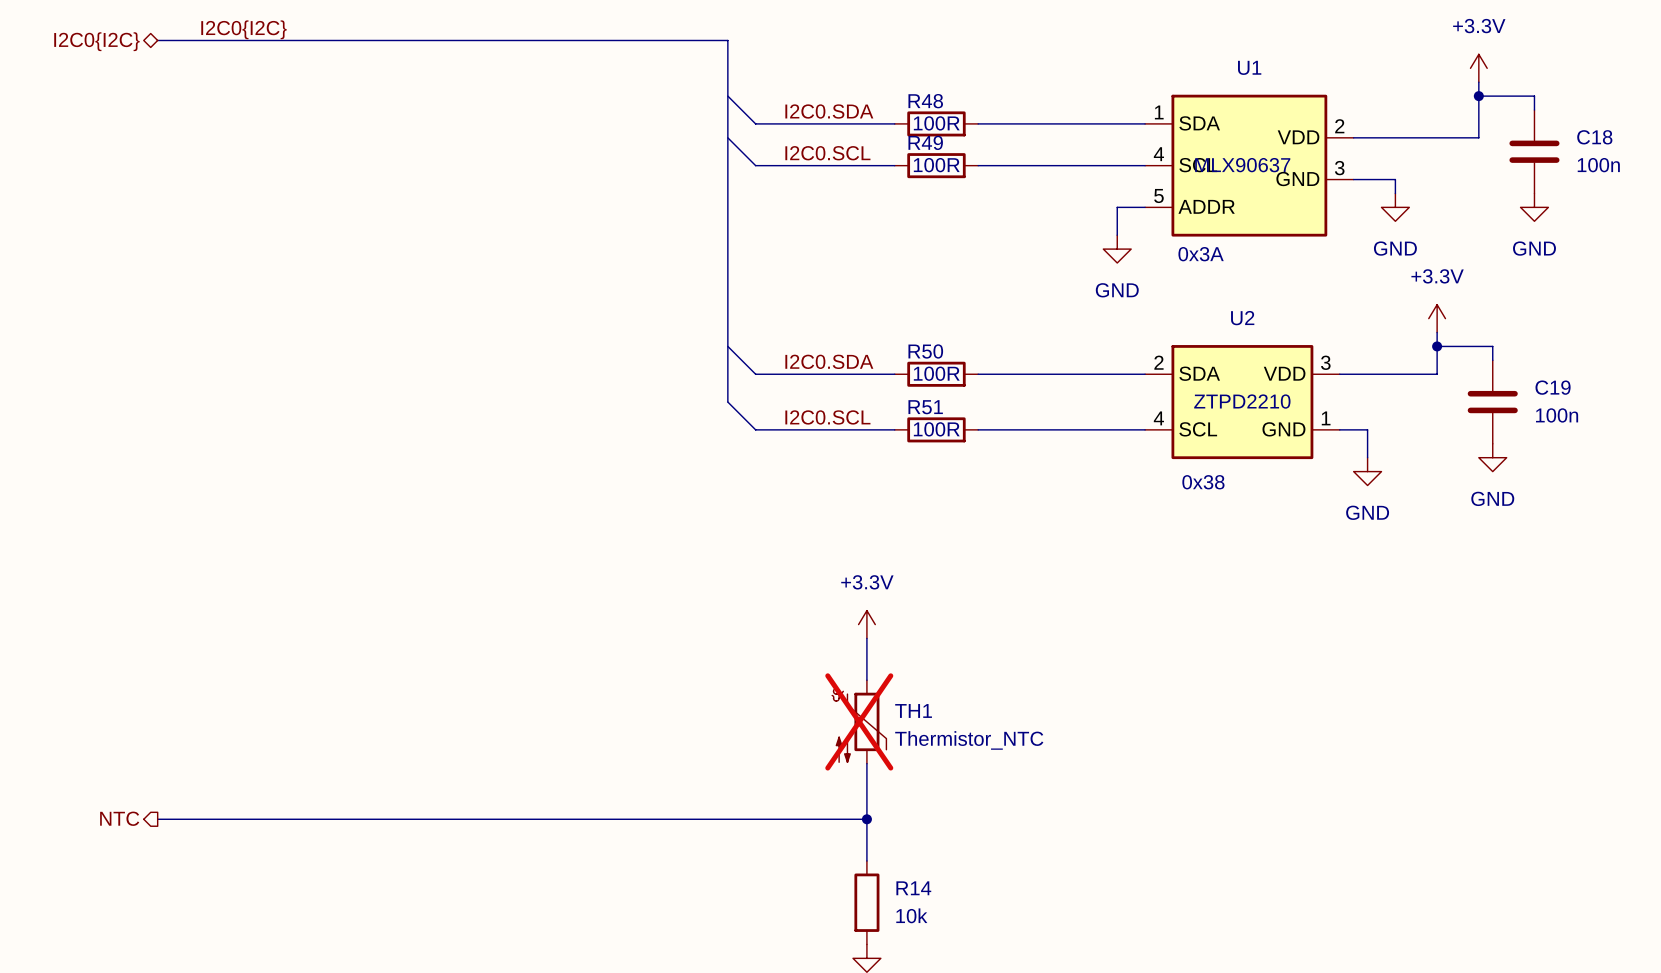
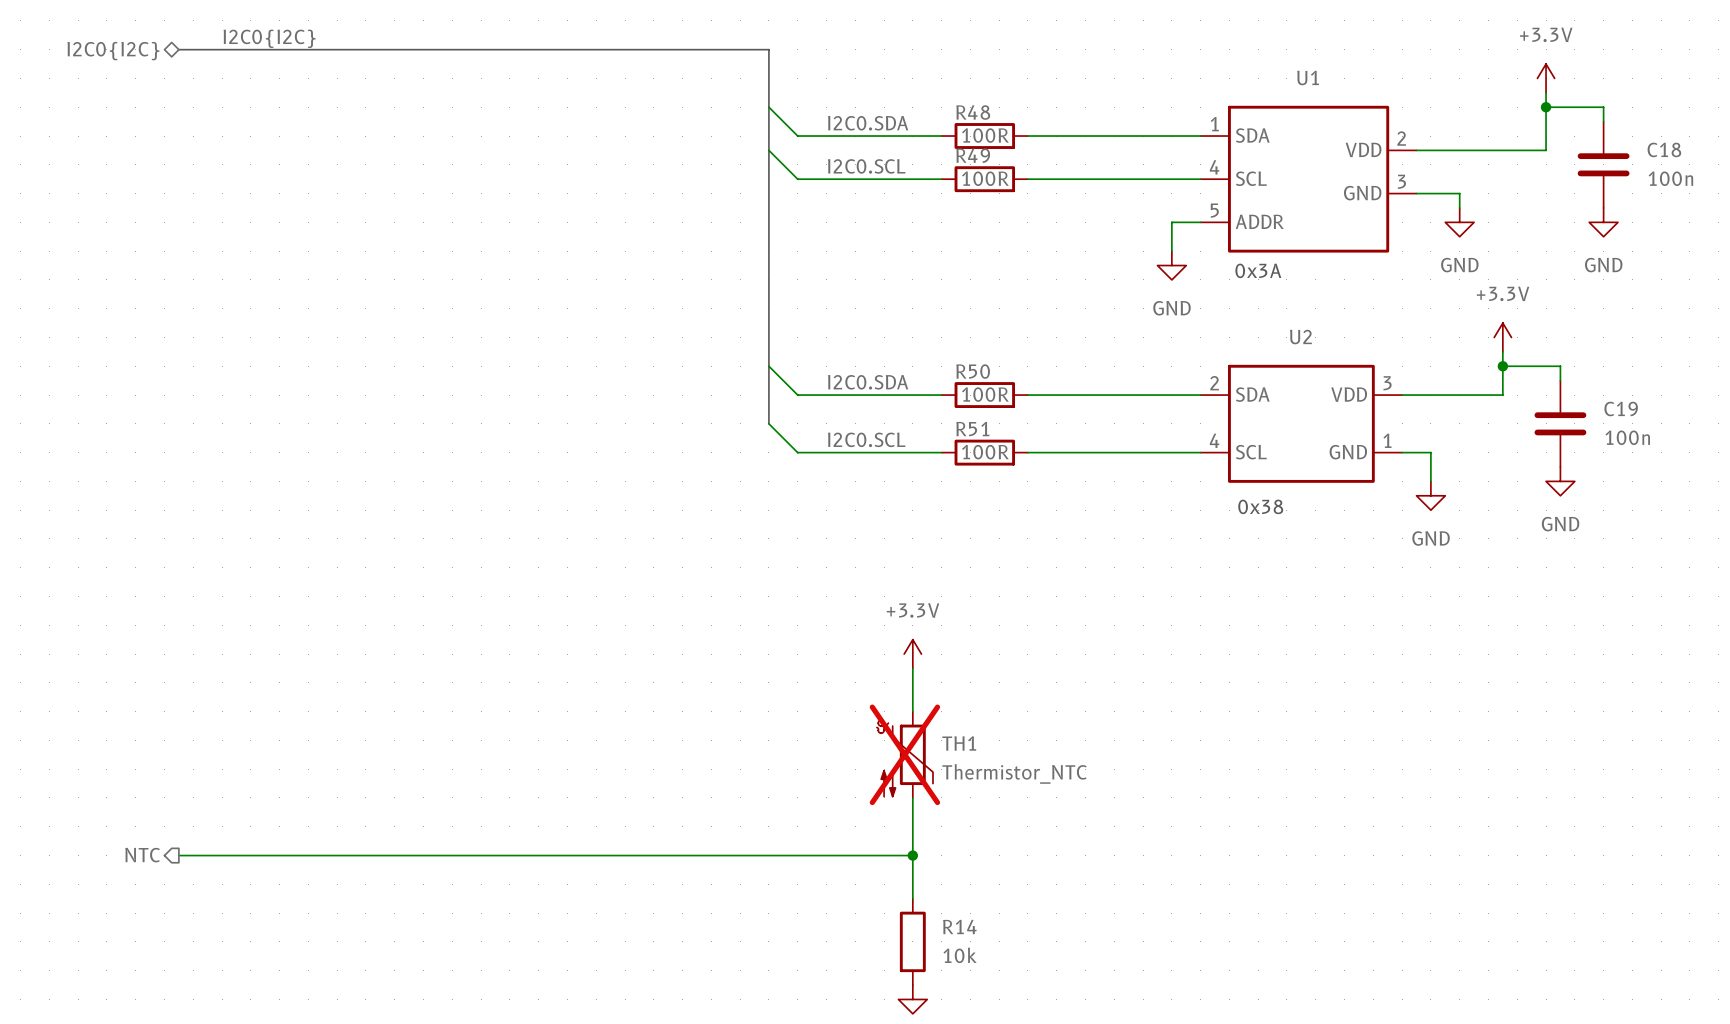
U1 value: MLX90637 (1242, 165) -> none
U2 value: ZTPD2210 (1242, 401) -> none

